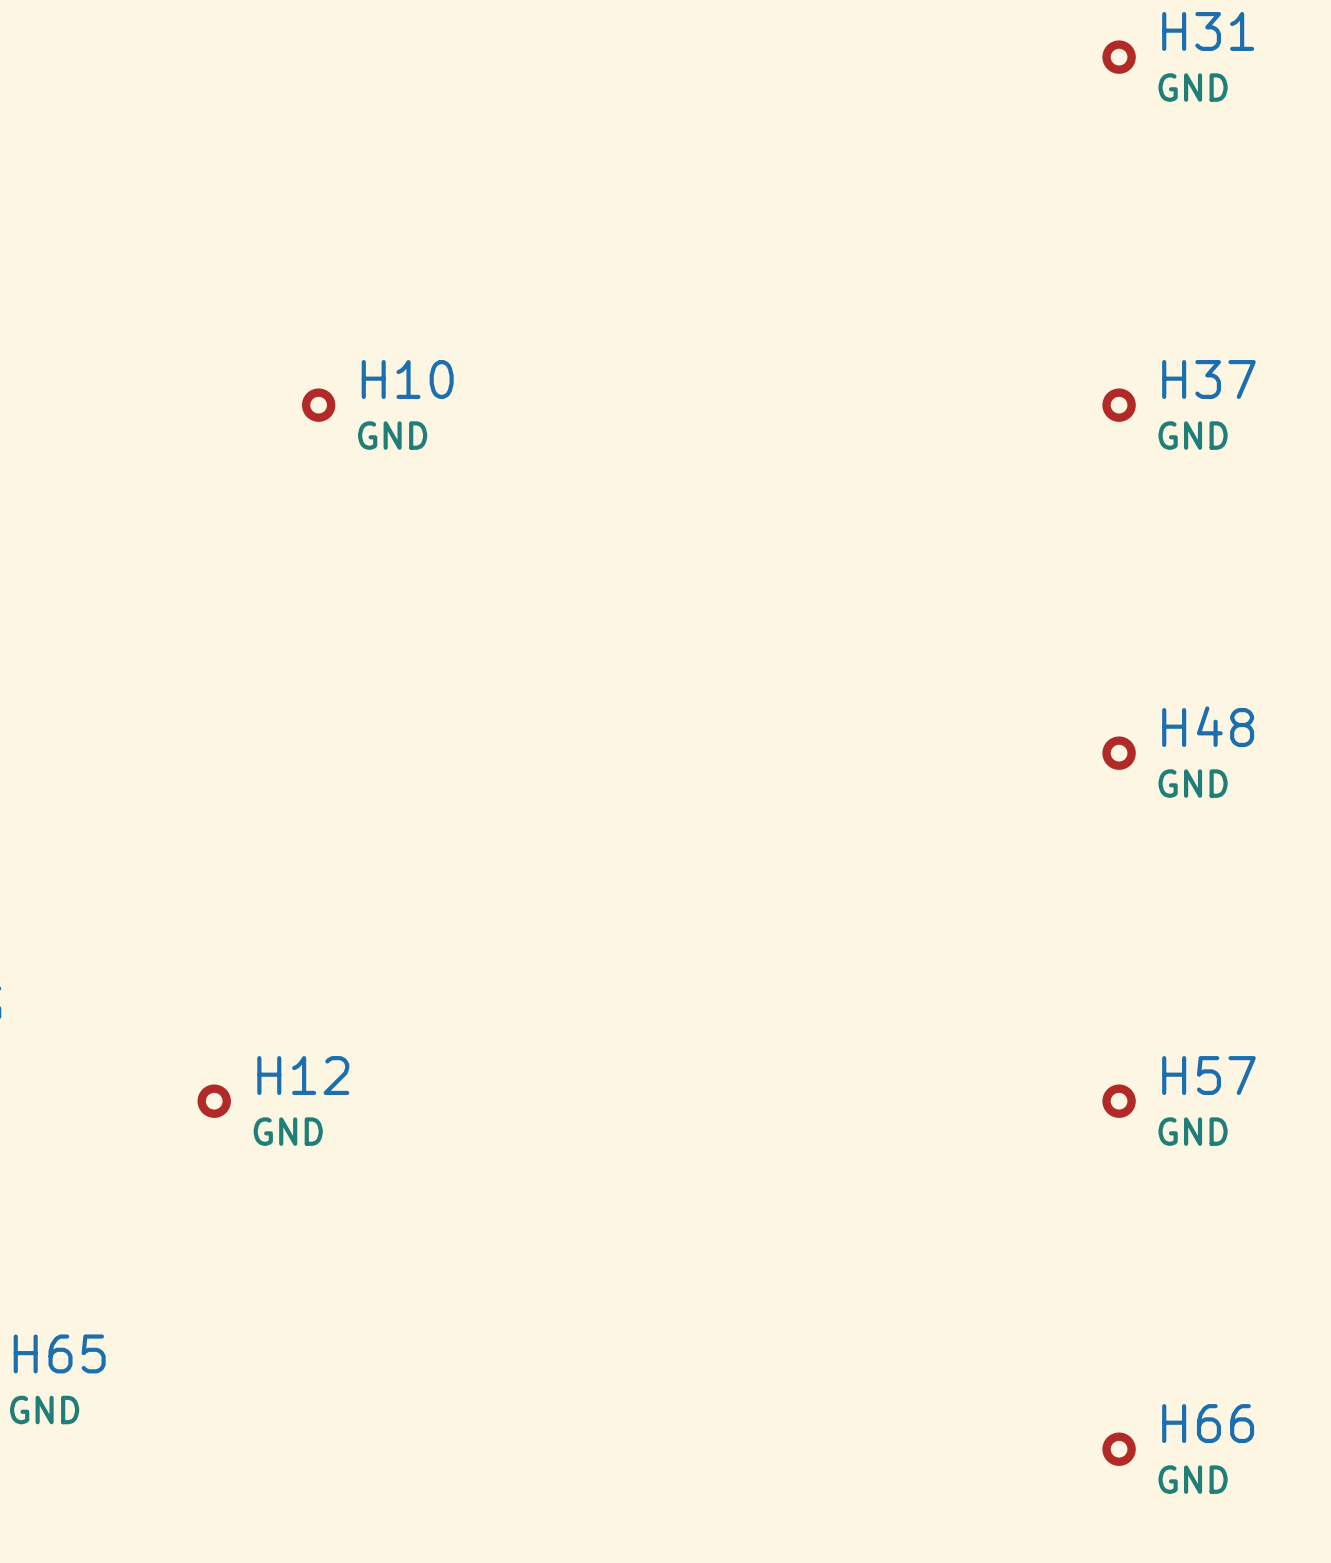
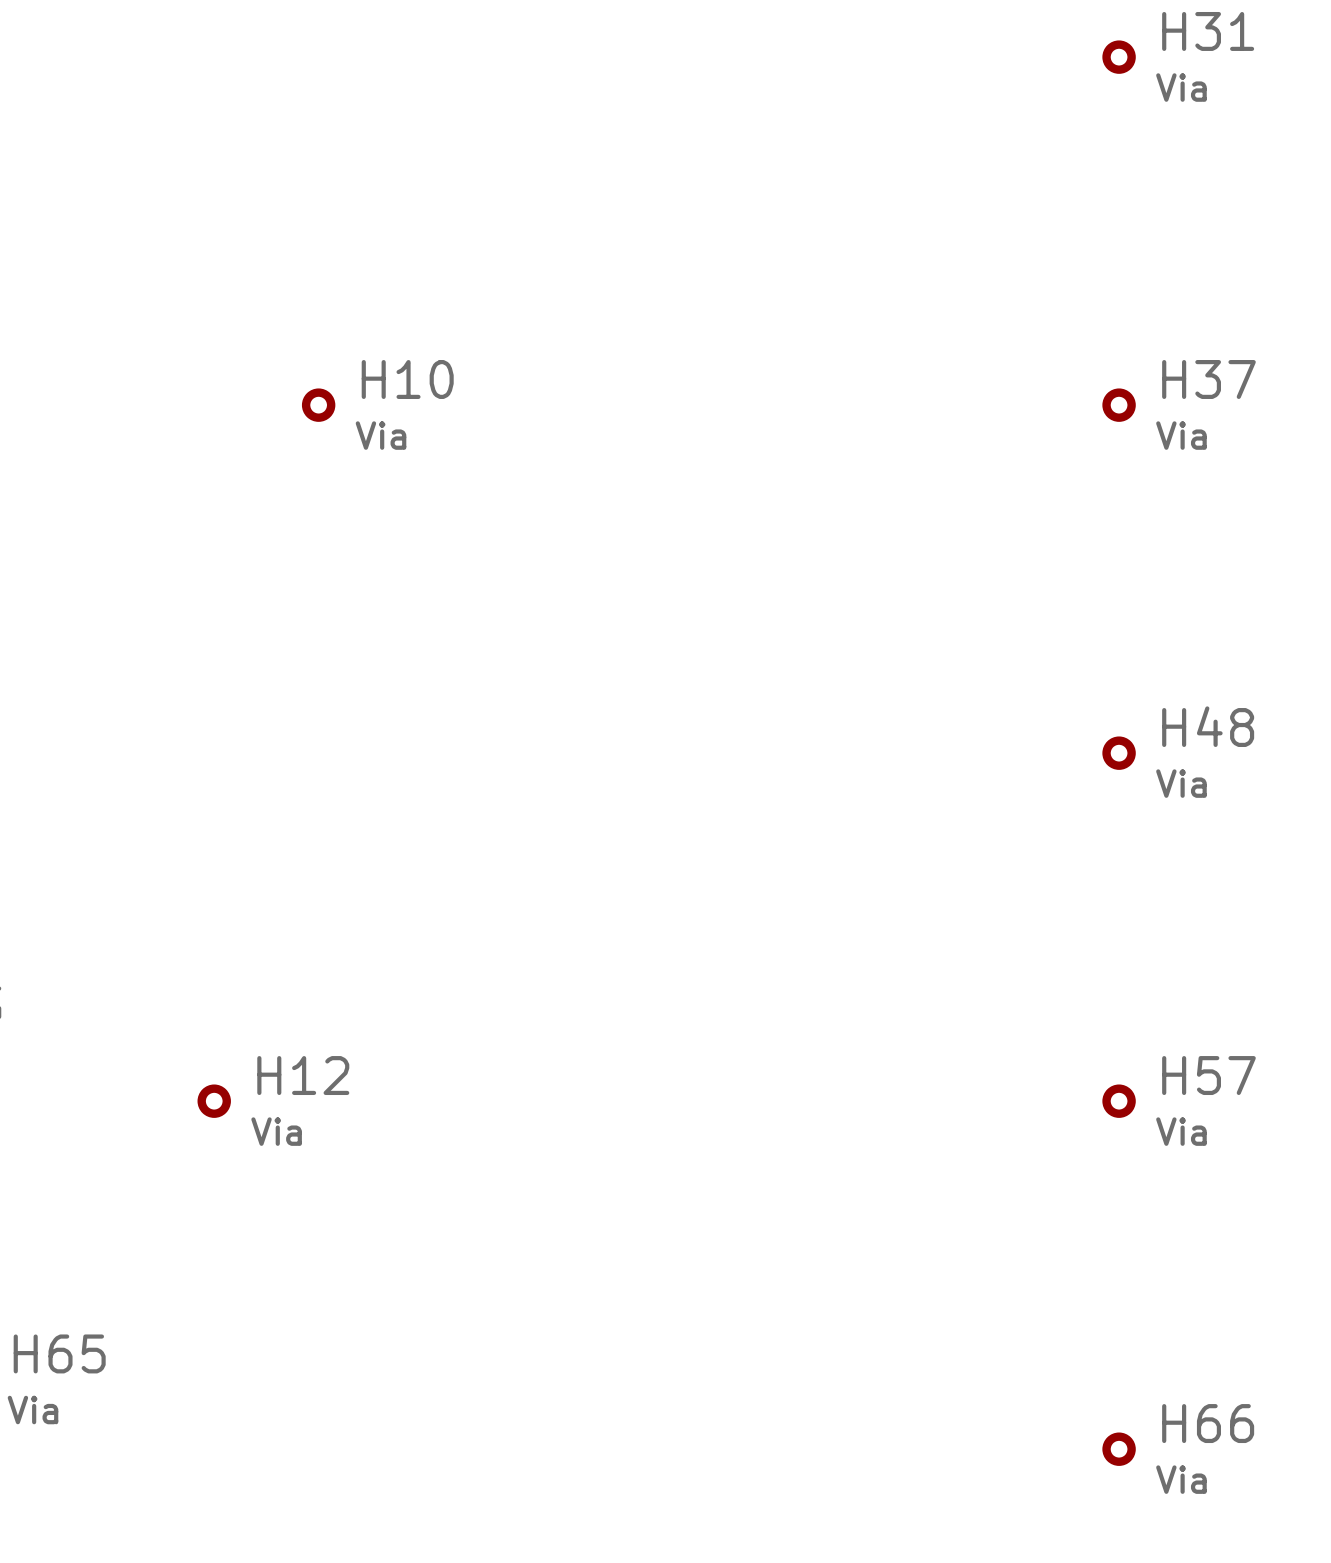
H31 value: GND (1193, 87) -> Via (1181, 87)
H10 value: GND (392, 435) -> Via (381, 435)
H37 value: GND (1193, 435) -> Via (1181, 435)
H48 value: GND (1193, 783) -> Via (1181, 783)
H12 value: GND (288, 1131) -> Via (276, 1131)
H57 value: GND (1193, 1131) -> Via (1181, 1131)
H65 value: GND (44, 1410) -> Via (32, 1410)
H66 value: GND (1193, 1479) -> Via (1181, 1479)

